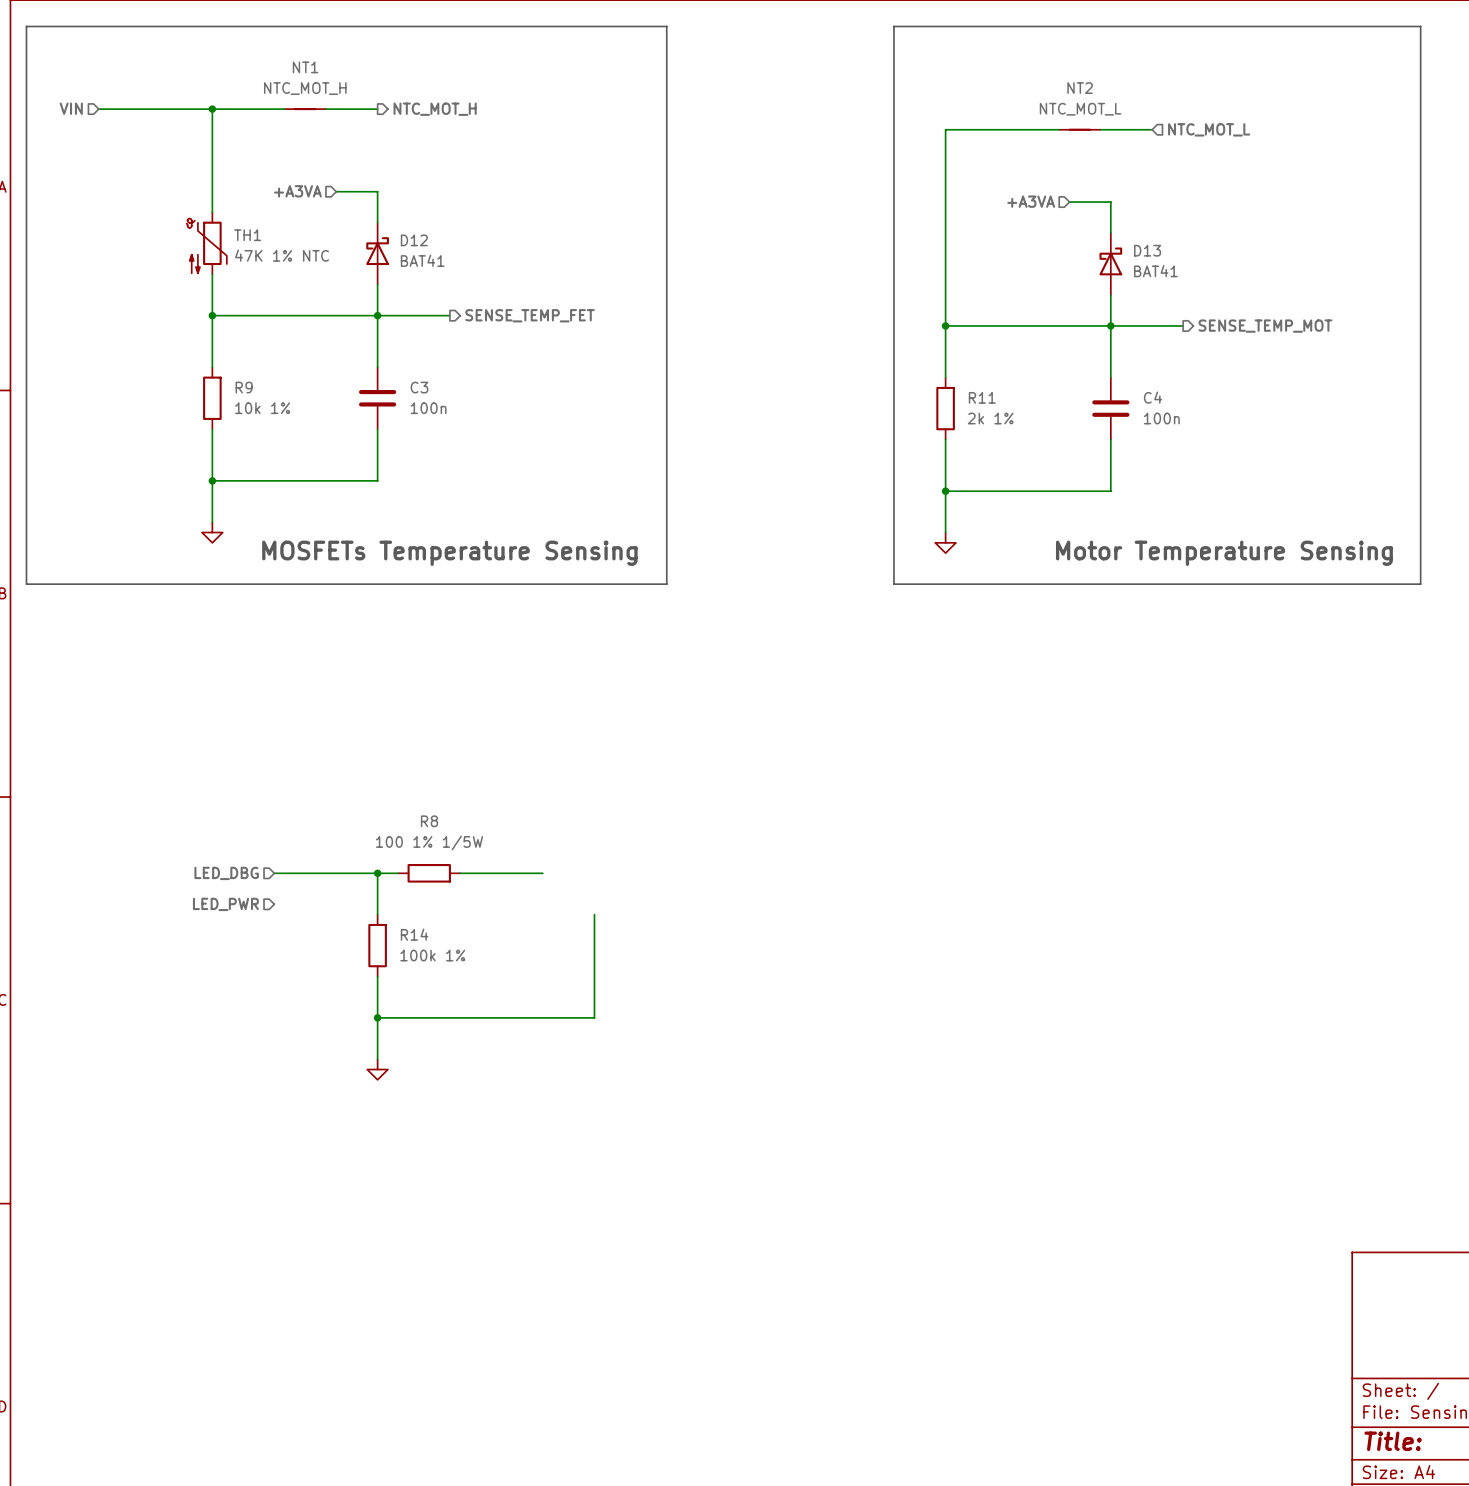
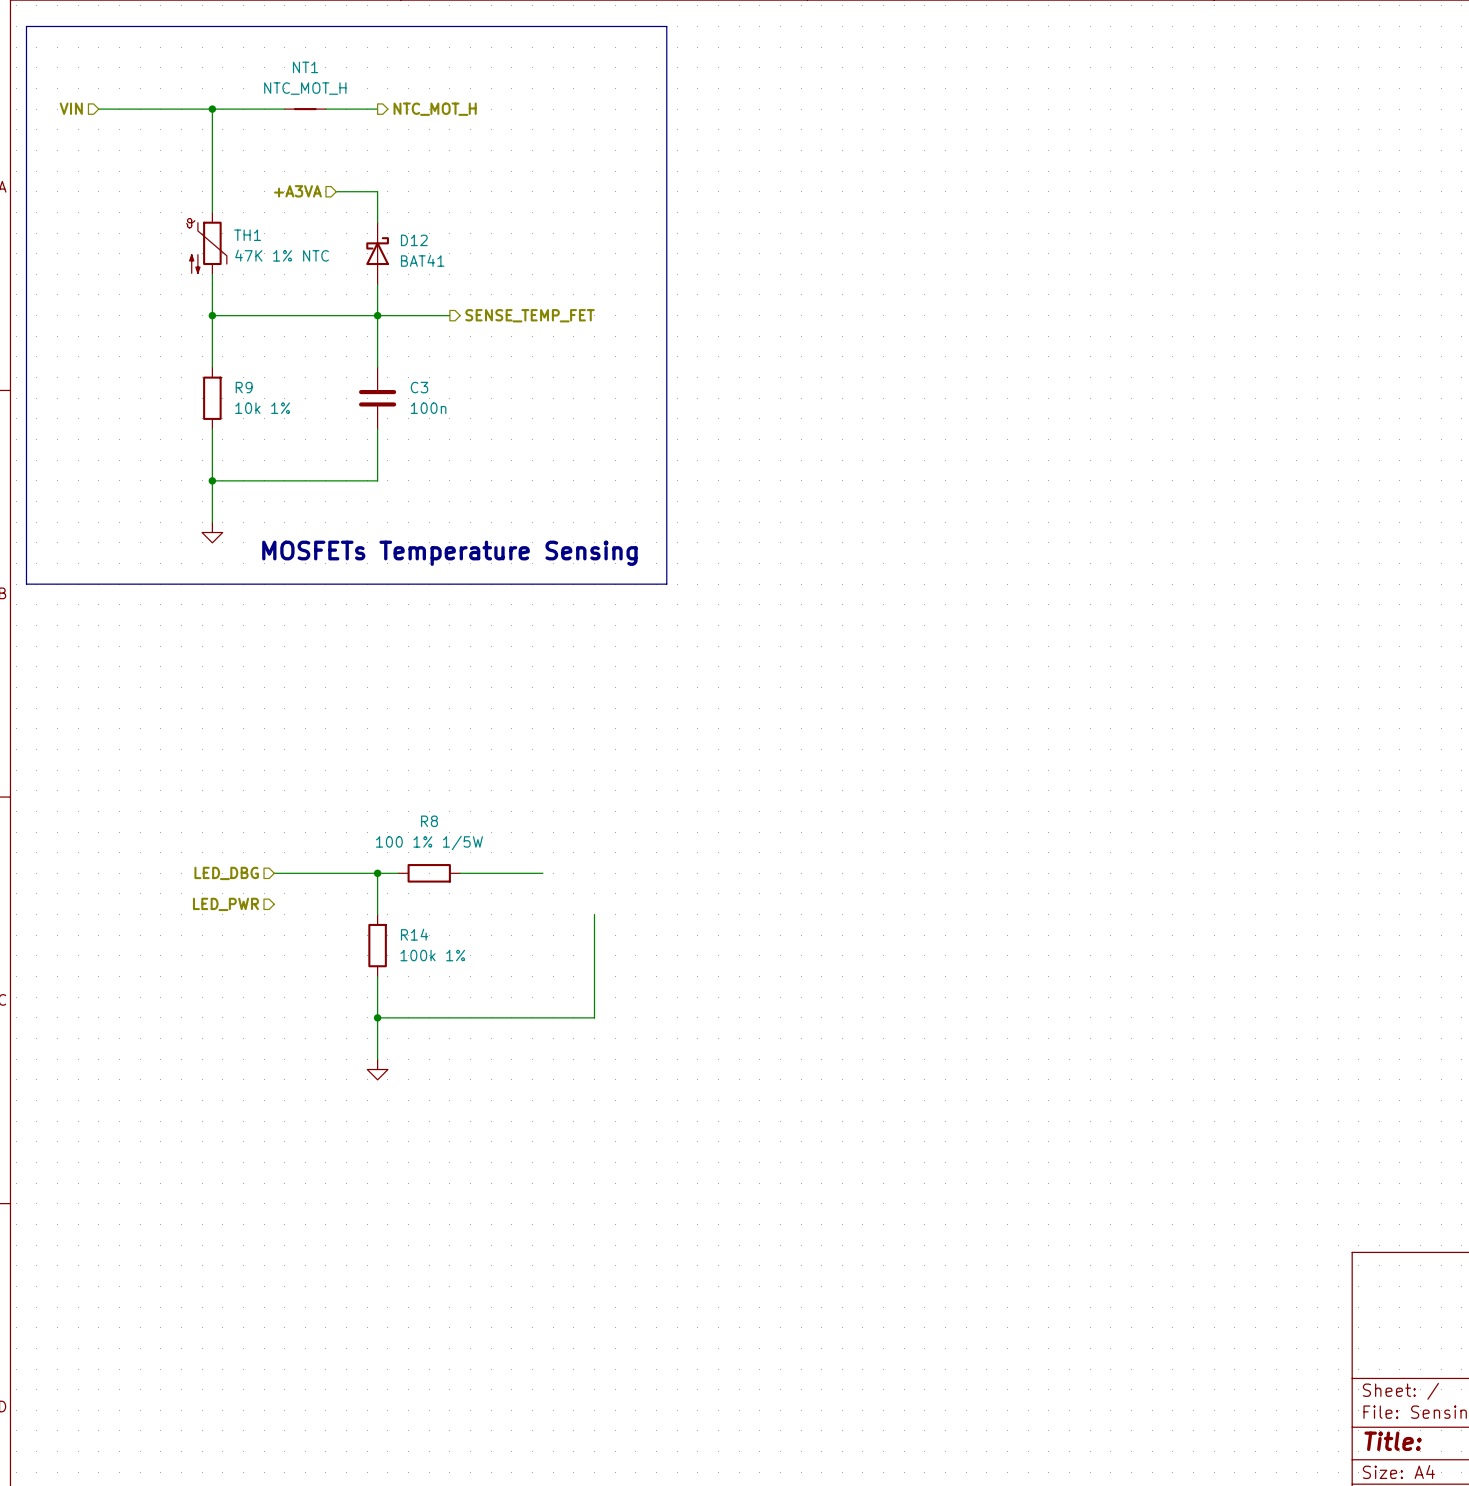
line: (893, 26) (1420, 26) (1420, 584) (893, 584) (893, 26) -> none
wire: (1059, 129) (945, 129) (945, 377) -> none
NT2: NTC_MOT_L (1079, 129) -> none
wire: (1100, 129) (1152, 129) -> none
hierarchical label: NTC_MOT_L (1209, 129) -> none
hierarchical label: +A3VA (1031, 201) -> none
wire: (1069, 202) (1110, 202) (1110, 233) -> none
D13: BAT41 (1110, 264) -> none
wire: (1110, 294) (1110, 377) -> none
wire: (945, 325) (1183, 325) -> none
junction: (945, 325) -> none
junction: (1110, 325) -> none
hierarchical label: SENSE_TEMP_MOT (1265, 326) -> none
R11: 2k 1% (945, 408) -> none
C4: 100n (1110, 408) -> none
wire: (945, 439) (945, 532) -> none
wire: (1110, 439) (1110, 491) (945, 491) -> none
junction: (945, 491) -> none
power symbol: (945, 542) -> none
text: Motor Temperature Sensing (1224, 553) -> none

